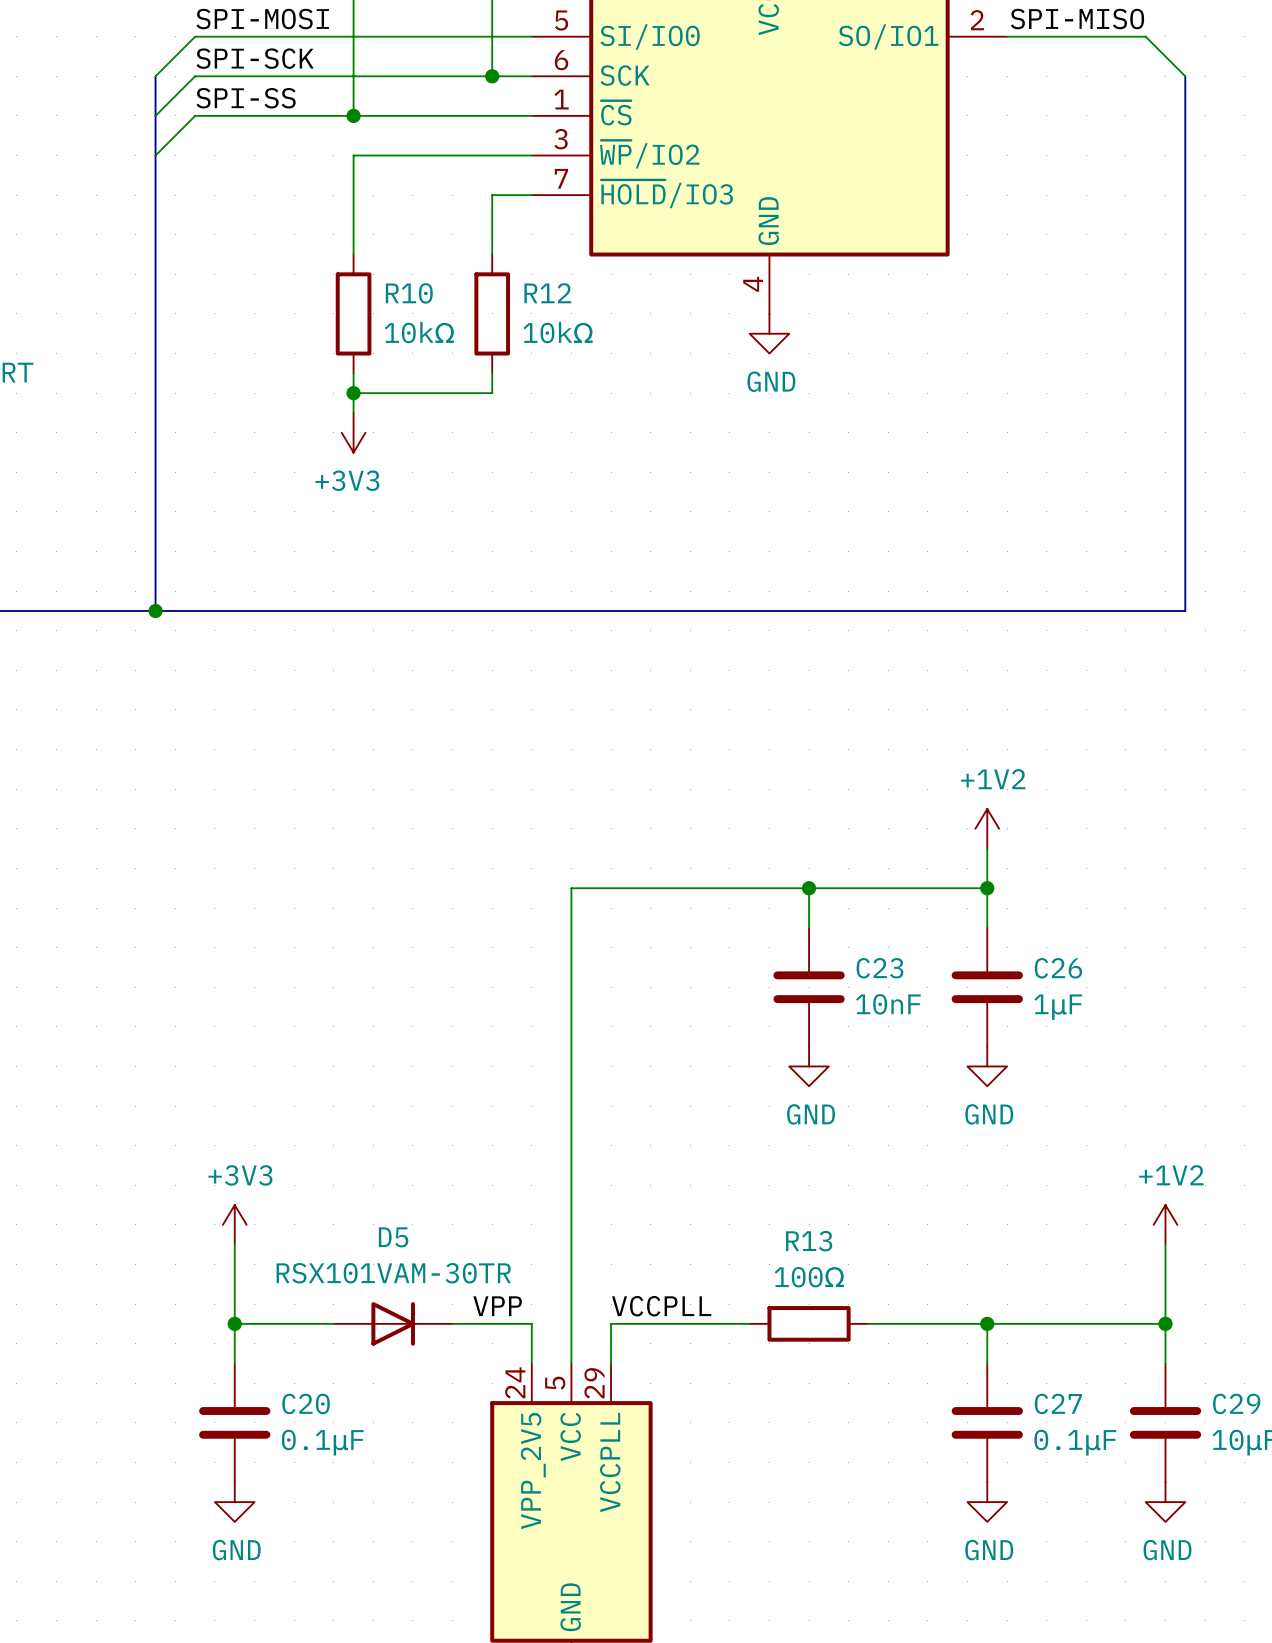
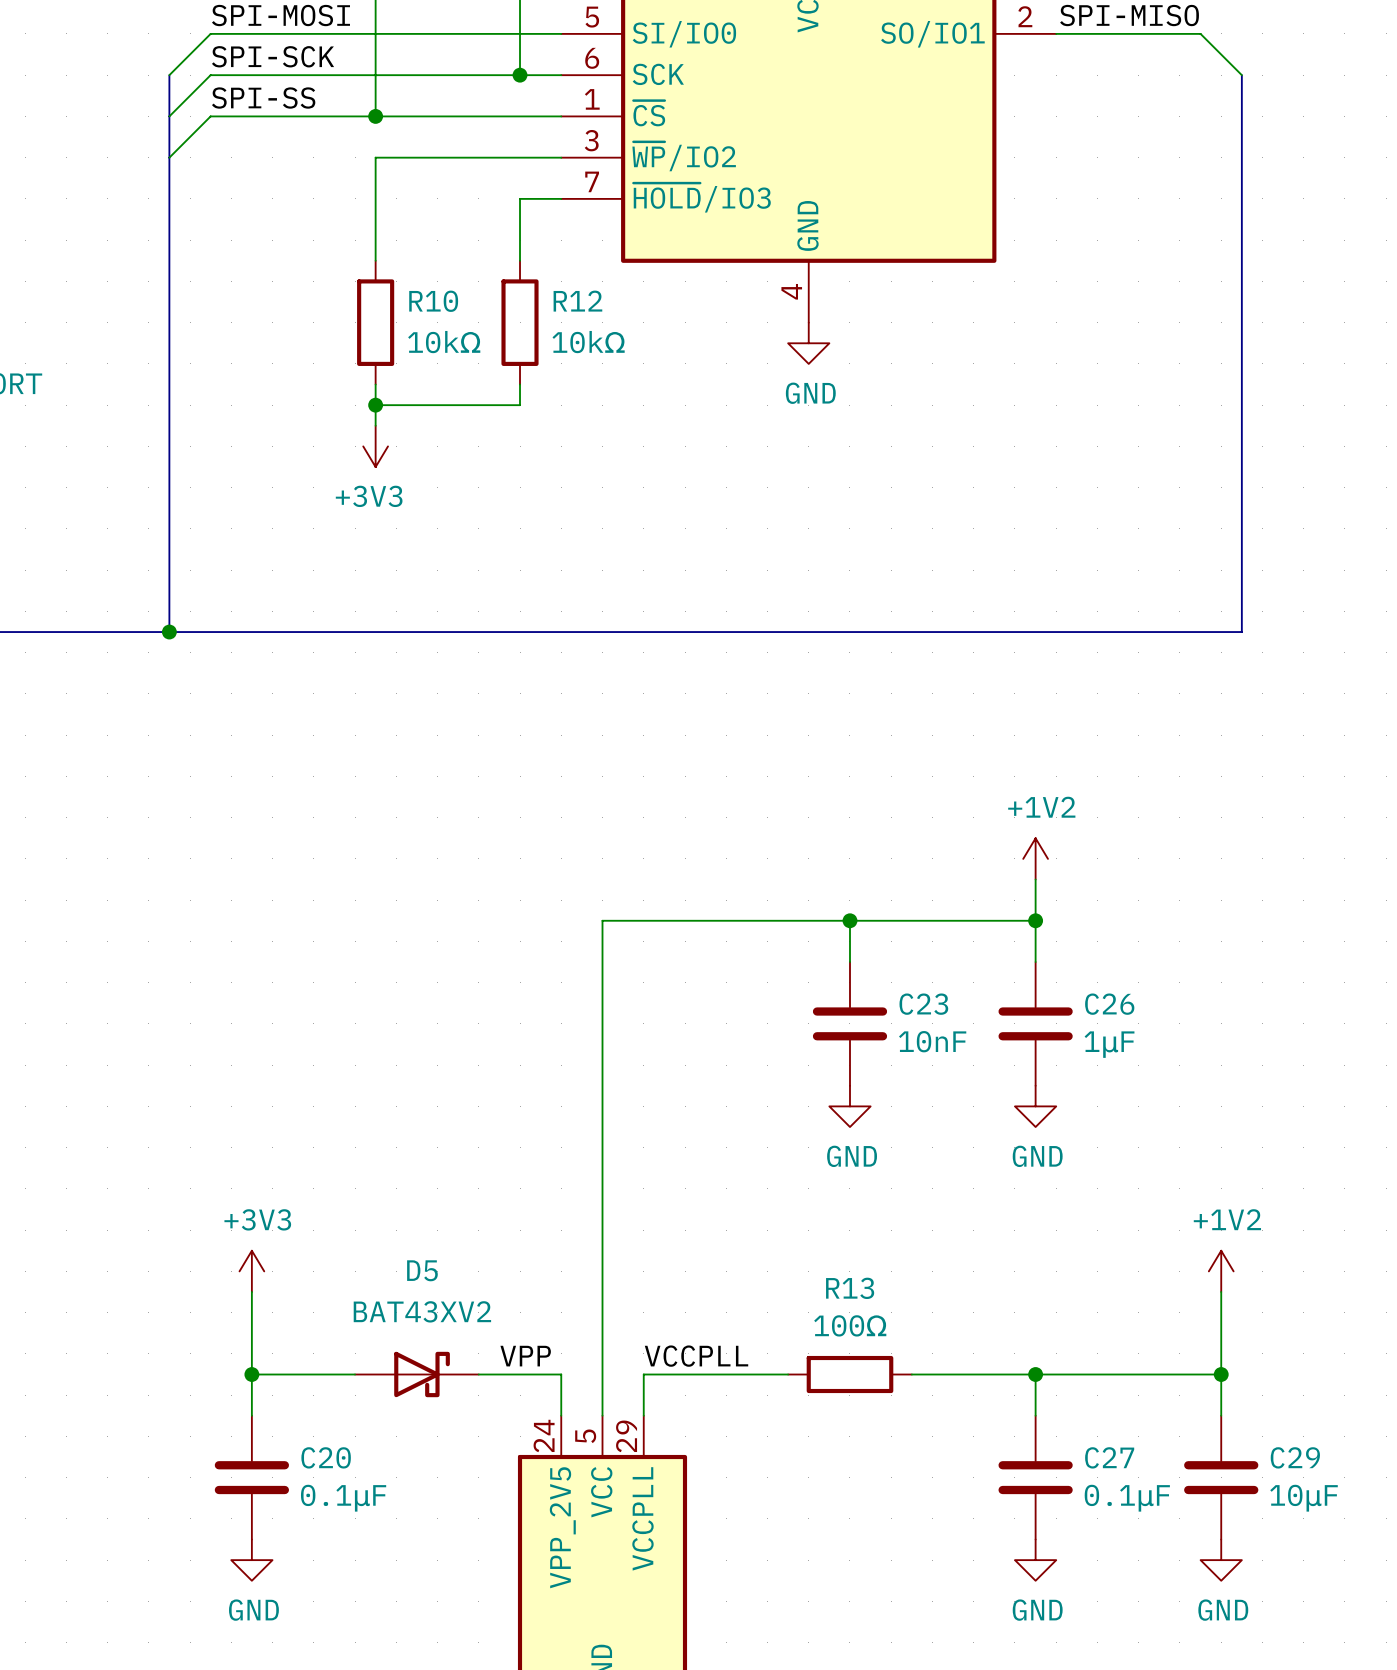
D5 name position: D5 (393, 1237) -> D5 (422, 1270)
D5 value: RSX101VAM-30TR (393, 1273) -> BAT43XV2 (422, 1311)
D5 symbol: [333, 1302, 453, 1346] -> [355, 1351, 479, 1398]

